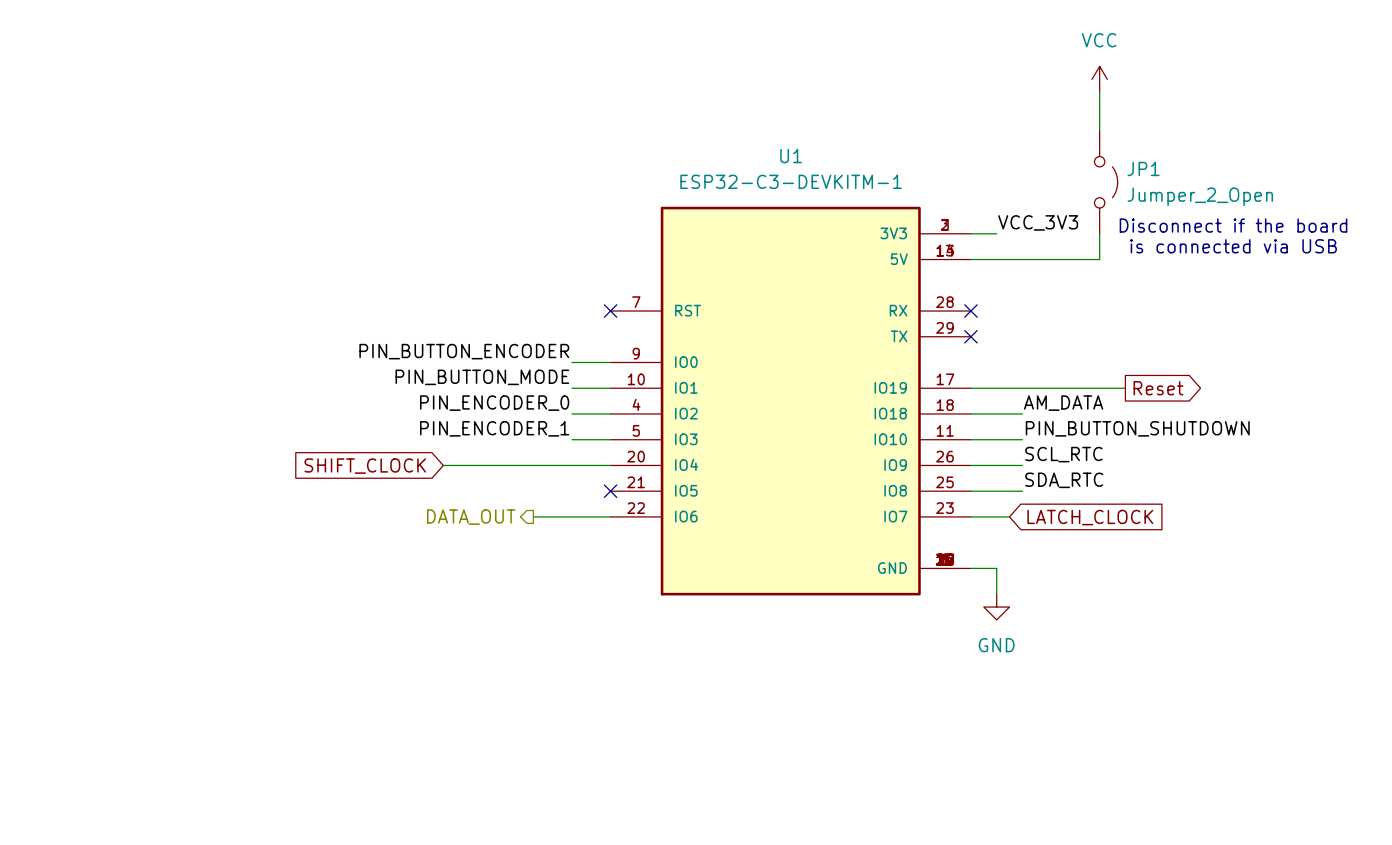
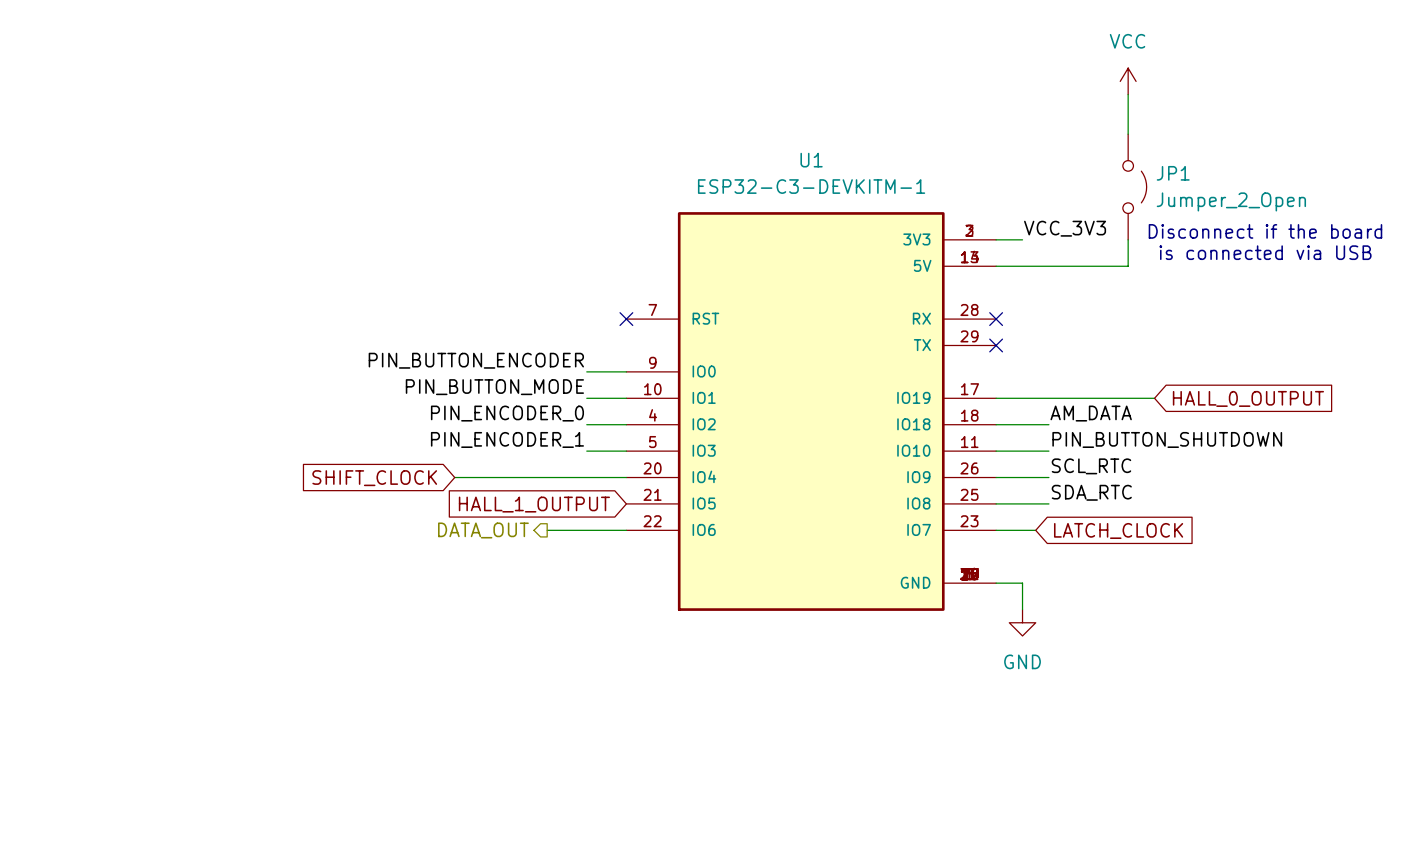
global label shape: output (1158, 388) -> input (1248, 398)
global label: Reset (1158, 388) -> HALL_0_OUTPUT (1248, 398)
global label: none -> HALL_1_OUTPUT (534, 504)
no-connect mark: (610, 491) -> none

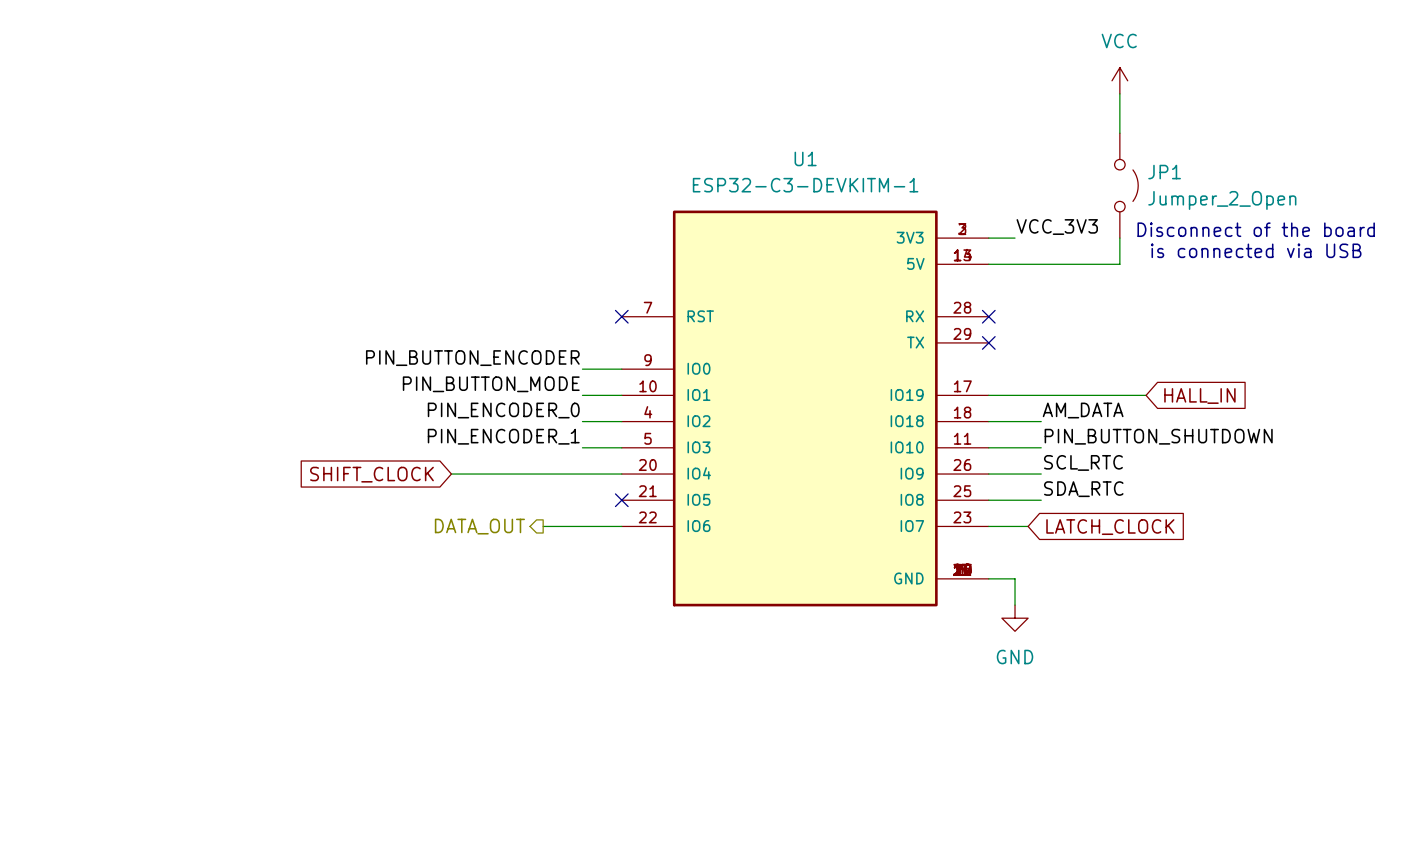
text: Disconnect if the board (1265, 231) -> Disconnect of the board (1256, 229)
global label: HALL_0_OUTPUT (1248, 398) -> HALL_IN (1199, 395)
no-connect mark: none -> (621, 500)
global label: HALL_1_OUTPUT (534, 504) -> none

